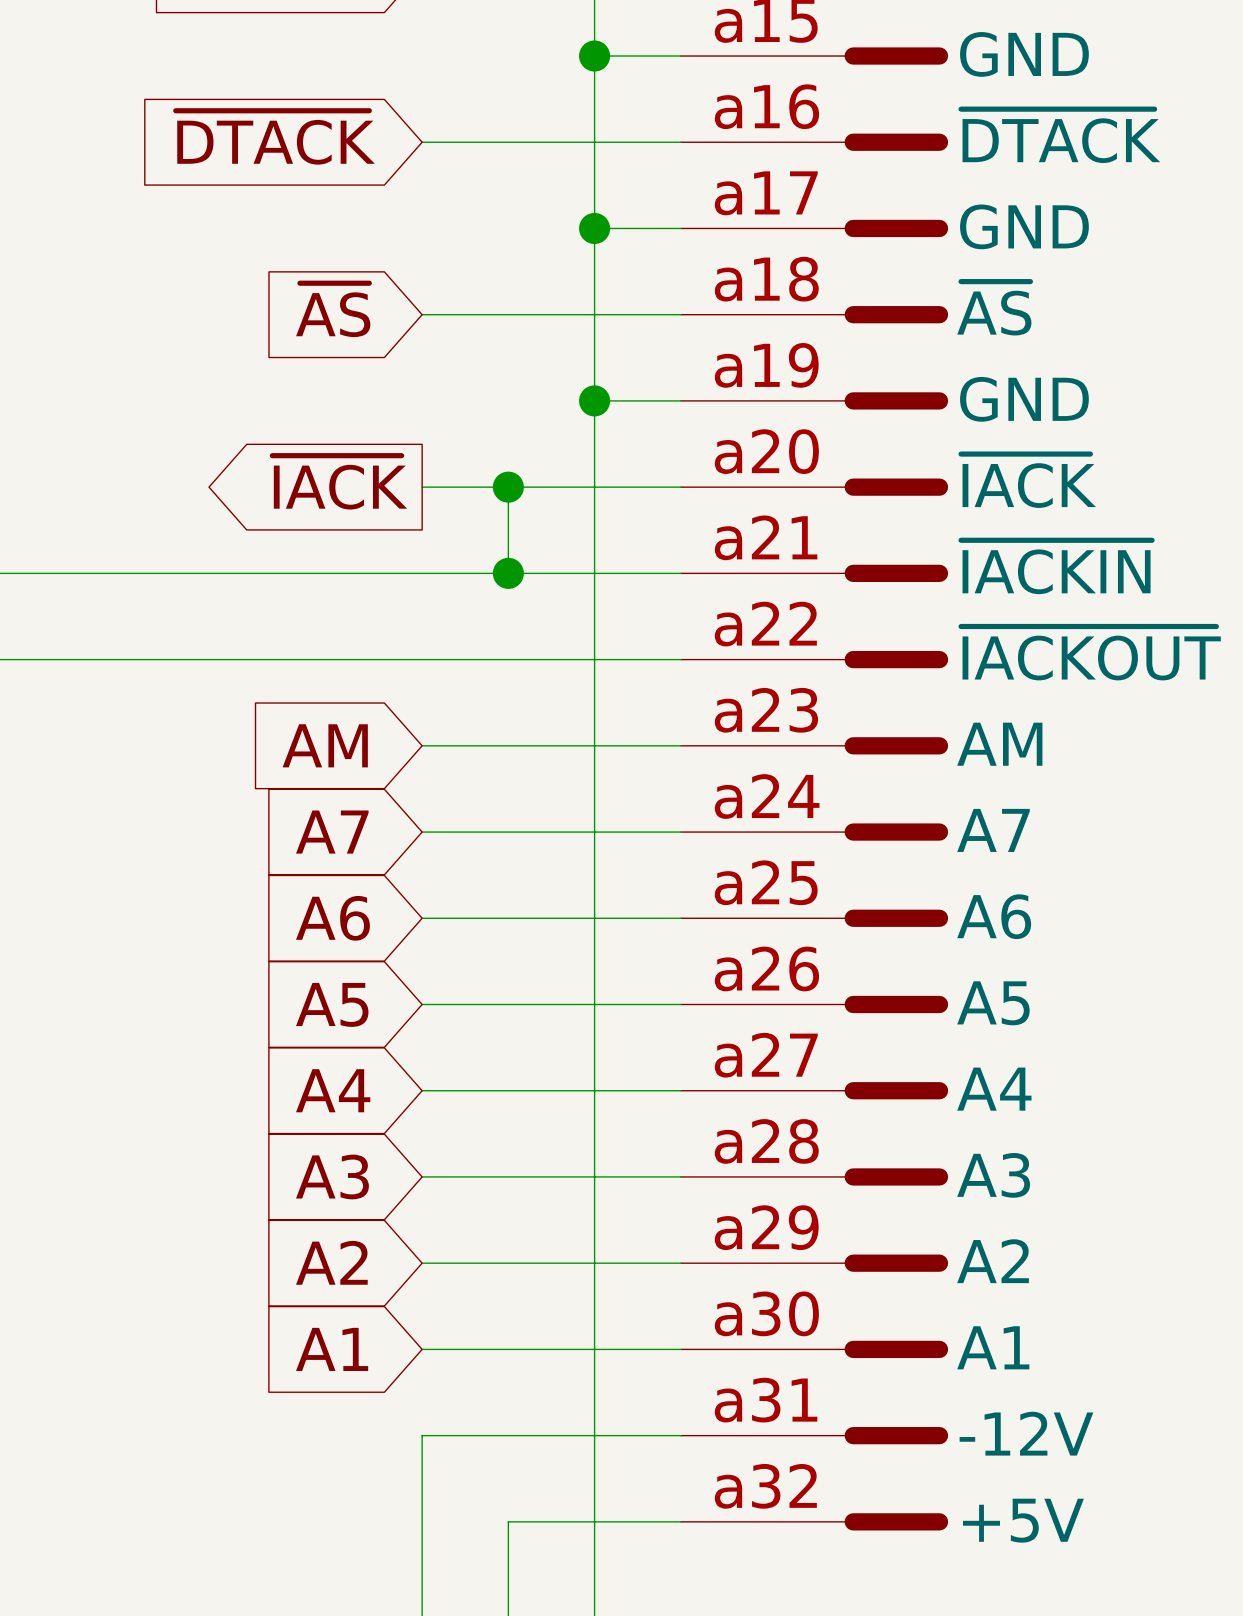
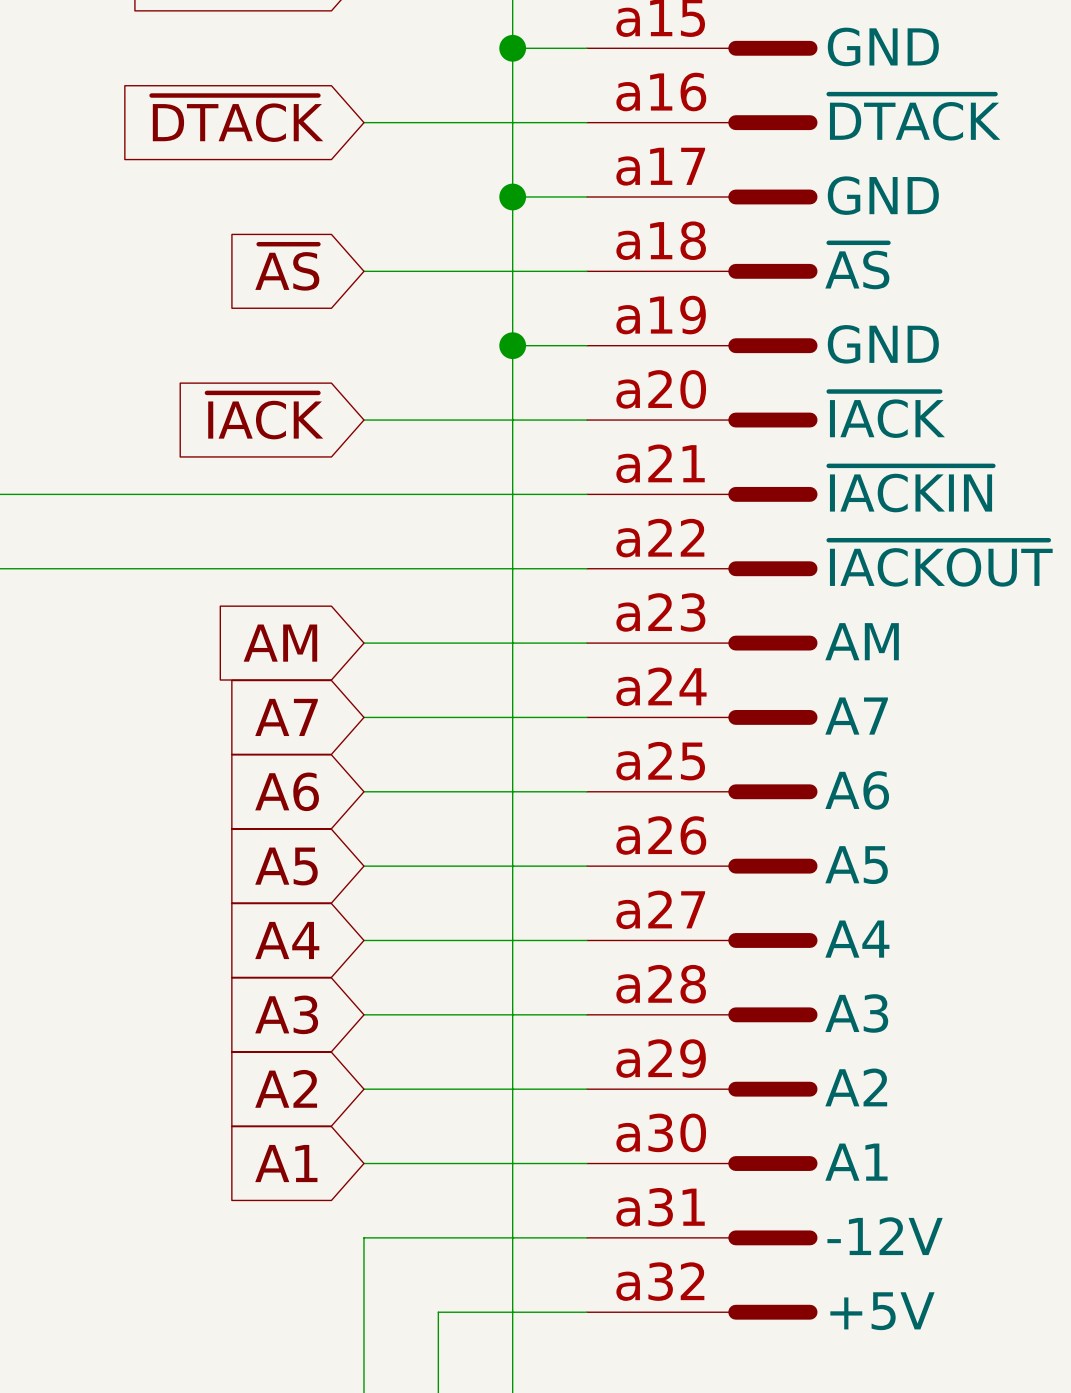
global label shape: output (339, 482) -> input (265, 416)
wire: (508, 487) (508, 573) -> none
junction: (508, 487) -> none
junction: (508, 573) -> none

